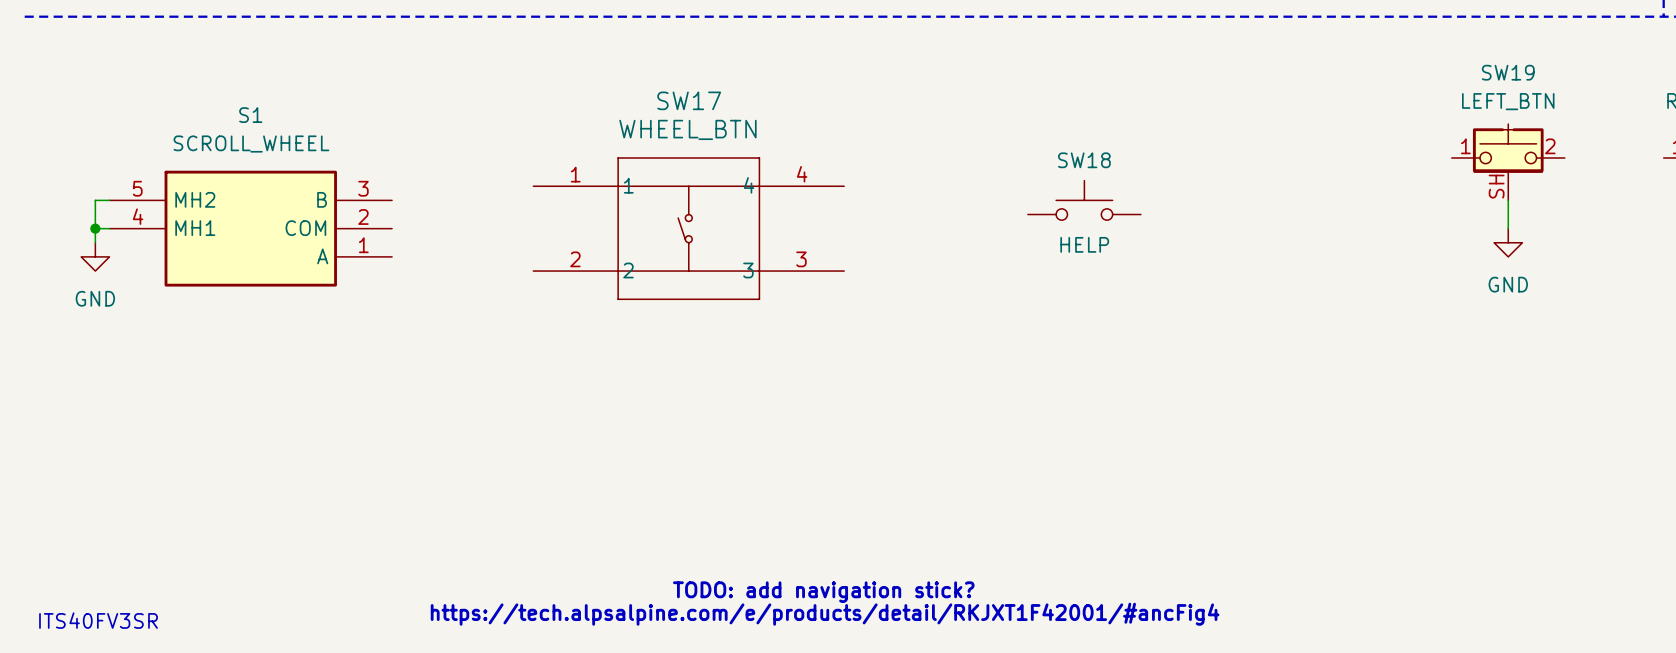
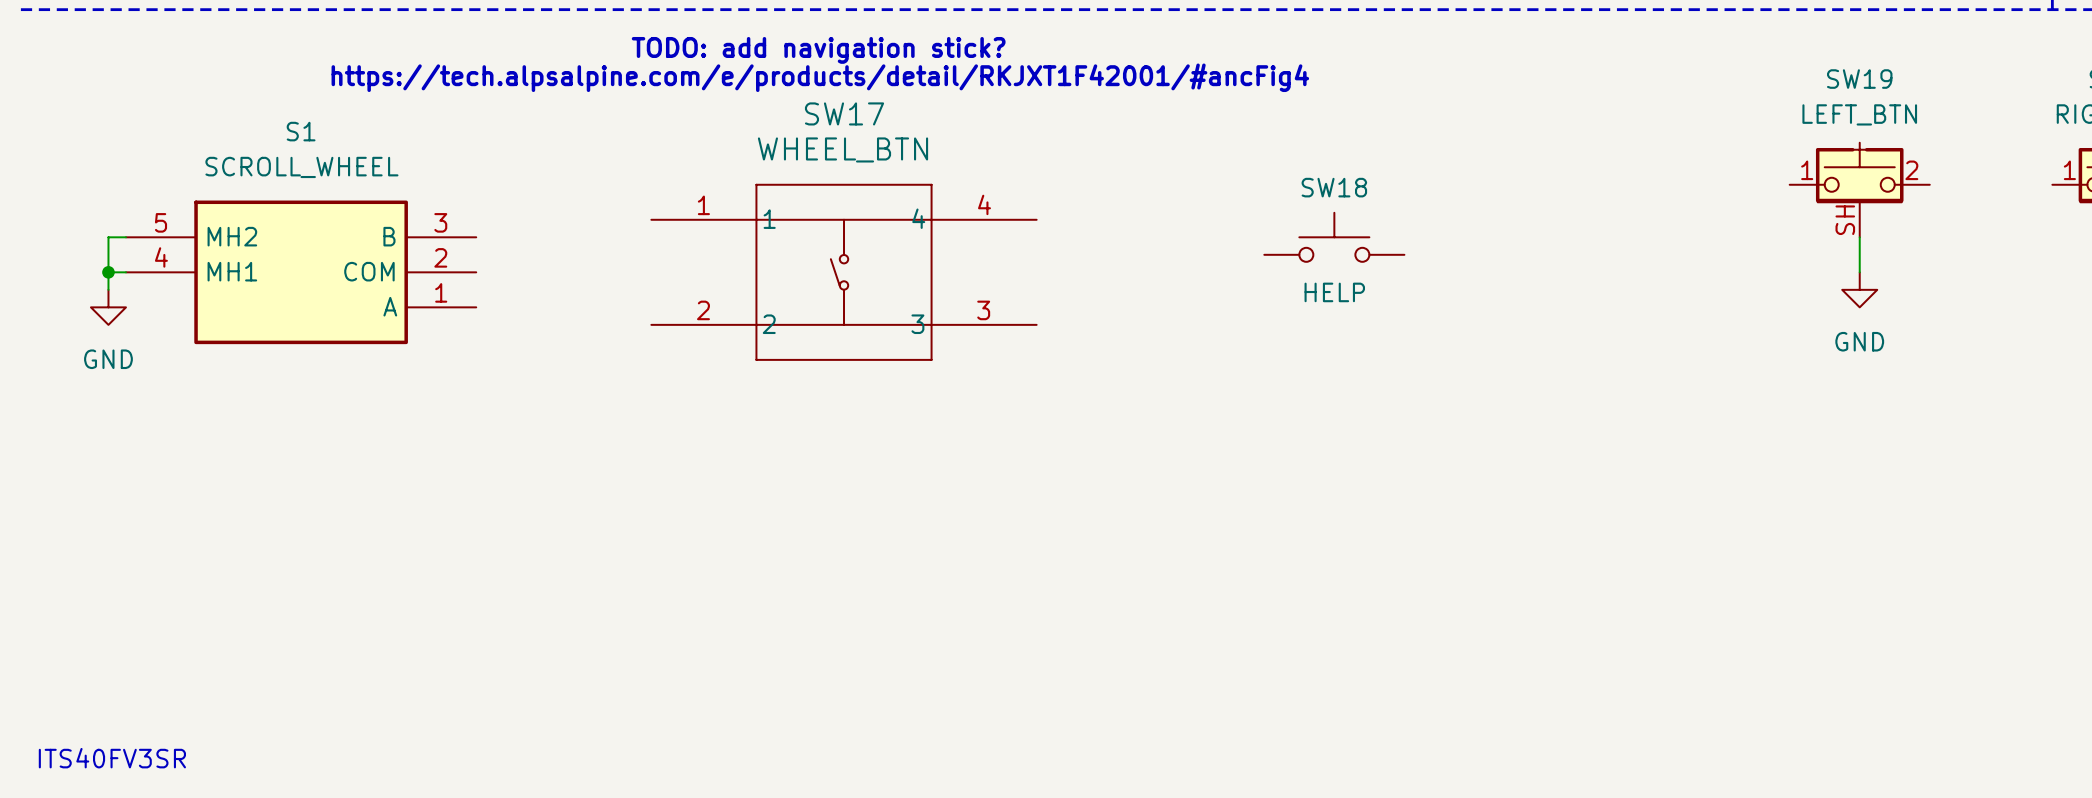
text: none -> TODO: add navigation stick? (818, 50)
text: none -> https://tech.alpsalpine.com/e/products/detail/RKJXT1F42001/#ancFig4 (820, 77)
text: TODO: add navigation stick? (823, 592) -> none
text: https://tech.alpsalpine.com/e/products/detail/RKJXT1F42001/#ancFig4 (825, 614) -> none

